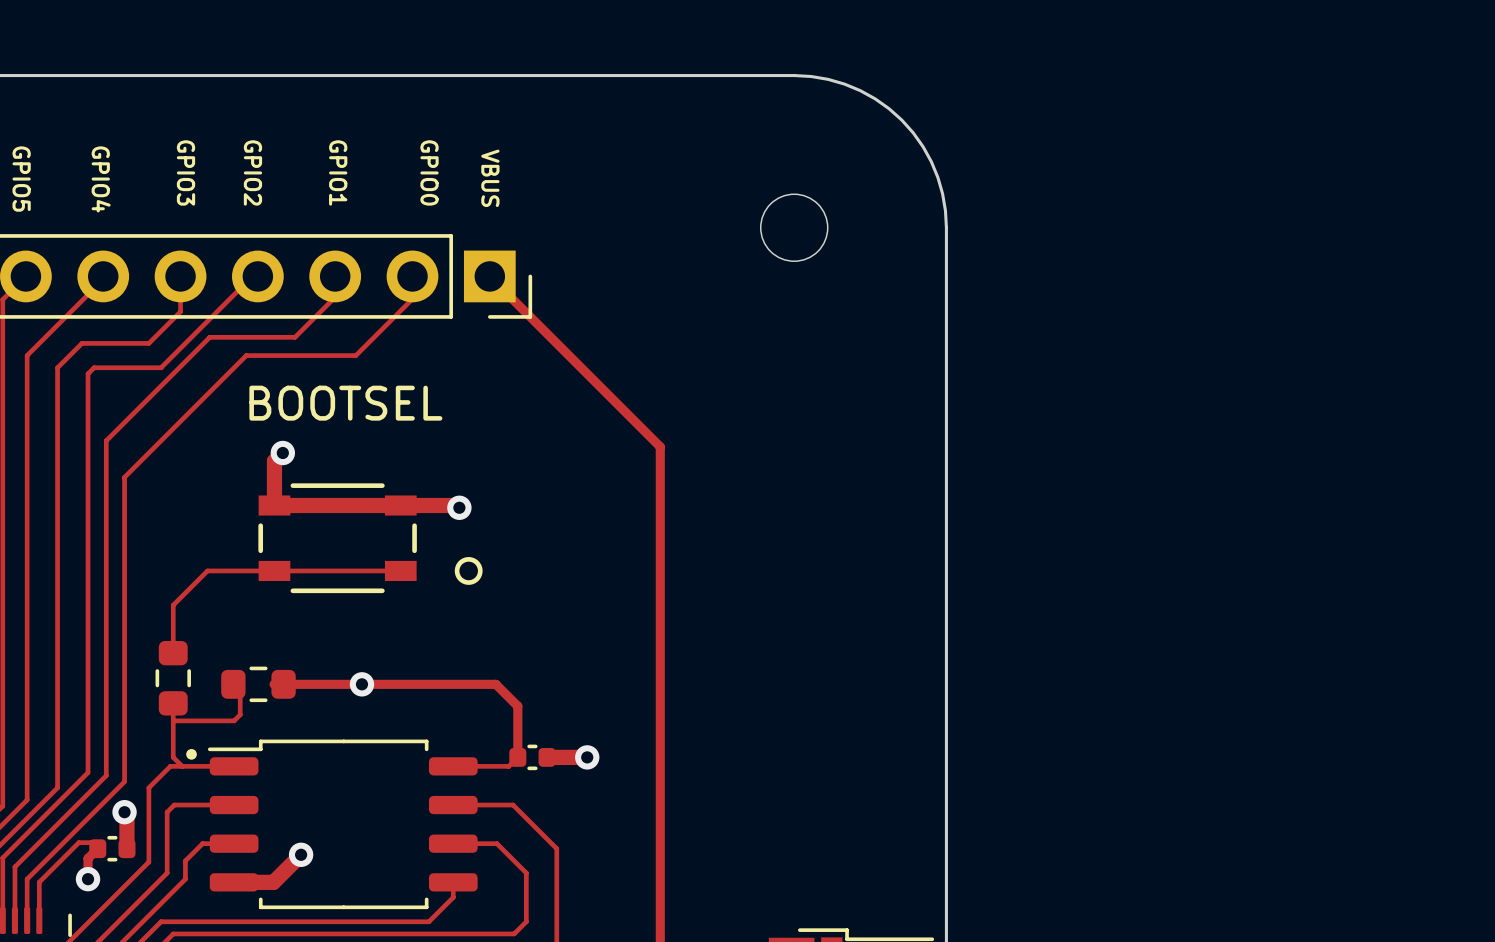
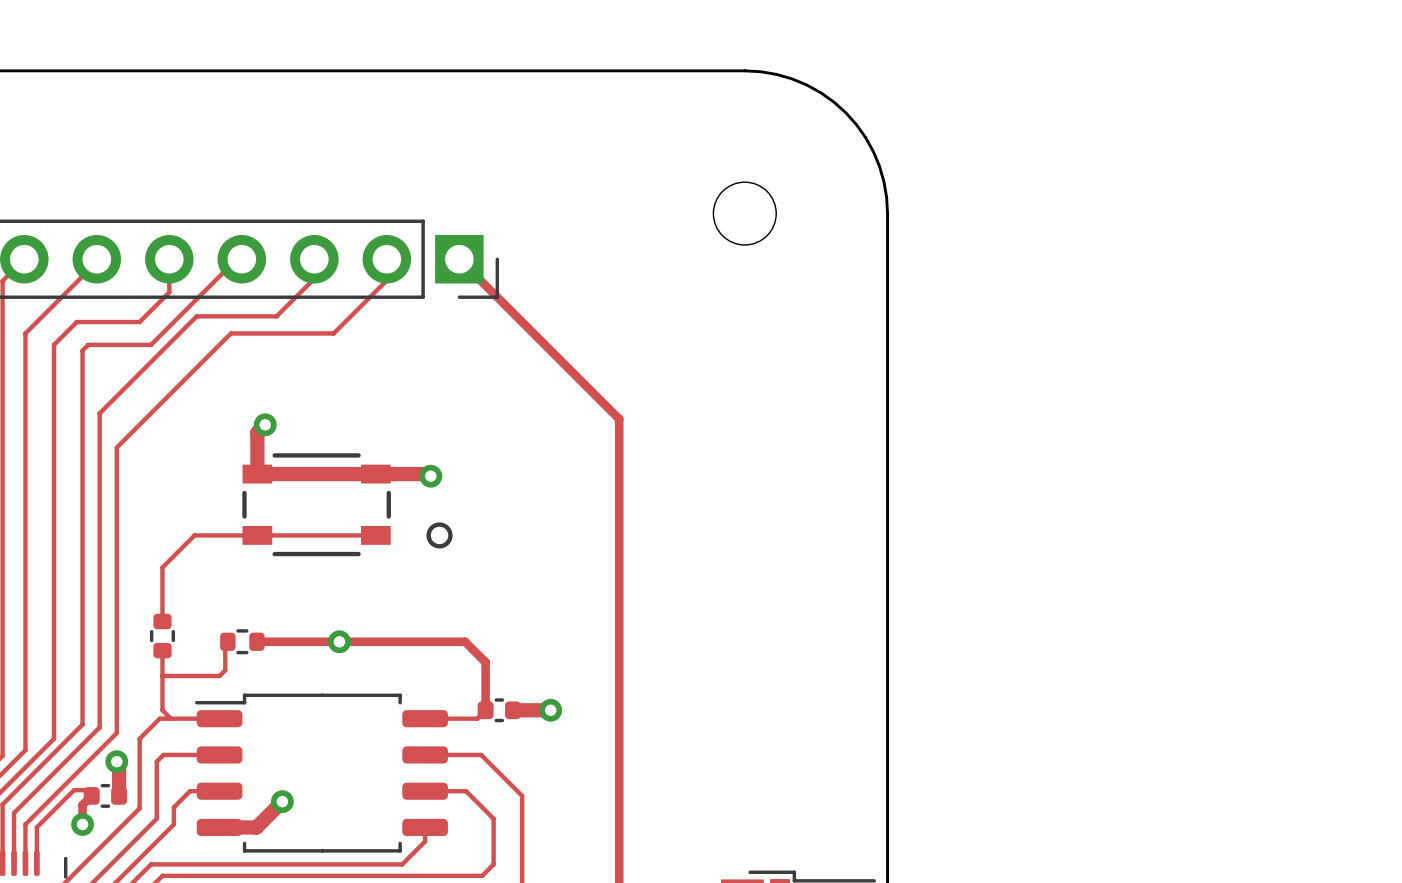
text: GPIO3 (185, 172) -> none
text: GPIO2 (252, 172) -> none
text: GPIO1 (338, 172) -> none
text: GPIO0 (429, 172) -> none
text: VBUS (490, 178) -> none
text: GPIO5 (21, 179) -> none
text: GPIO4 (101, 179) -> none
text: BOOTSEL (345, 403) -> none
part footprint: [155, 640, 191, 716] -> [149, 613, 176, 659]
part footprint: [221, 666, 296, 703] -> [220, 629, 265, 655]
drawing: [186, 749, 197, 760] -> none

